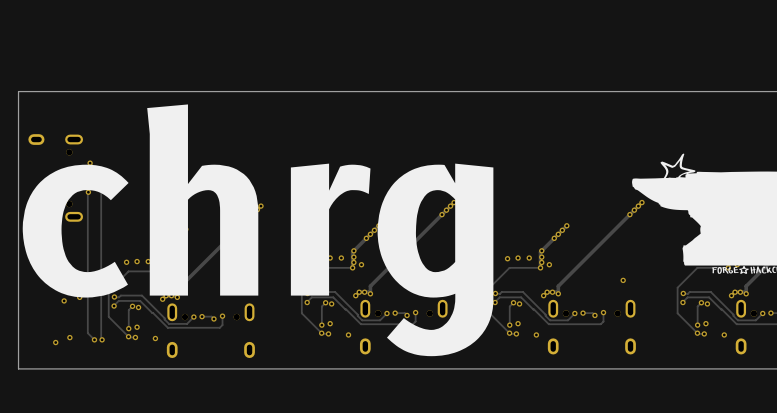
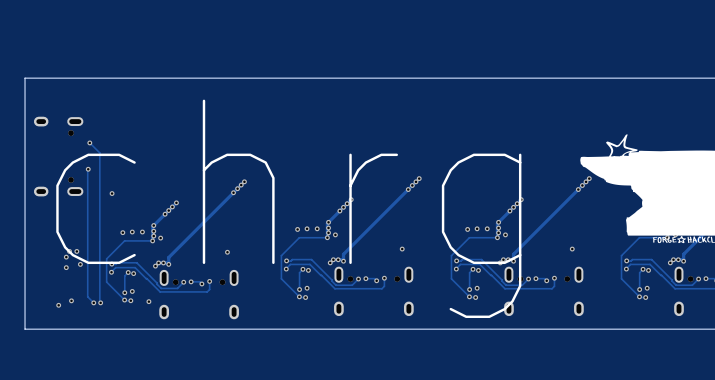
via: none -> (112, 193)
via: (348, 334) -> none
via: (536, 334) -> none
via: (724, 334) -> none

